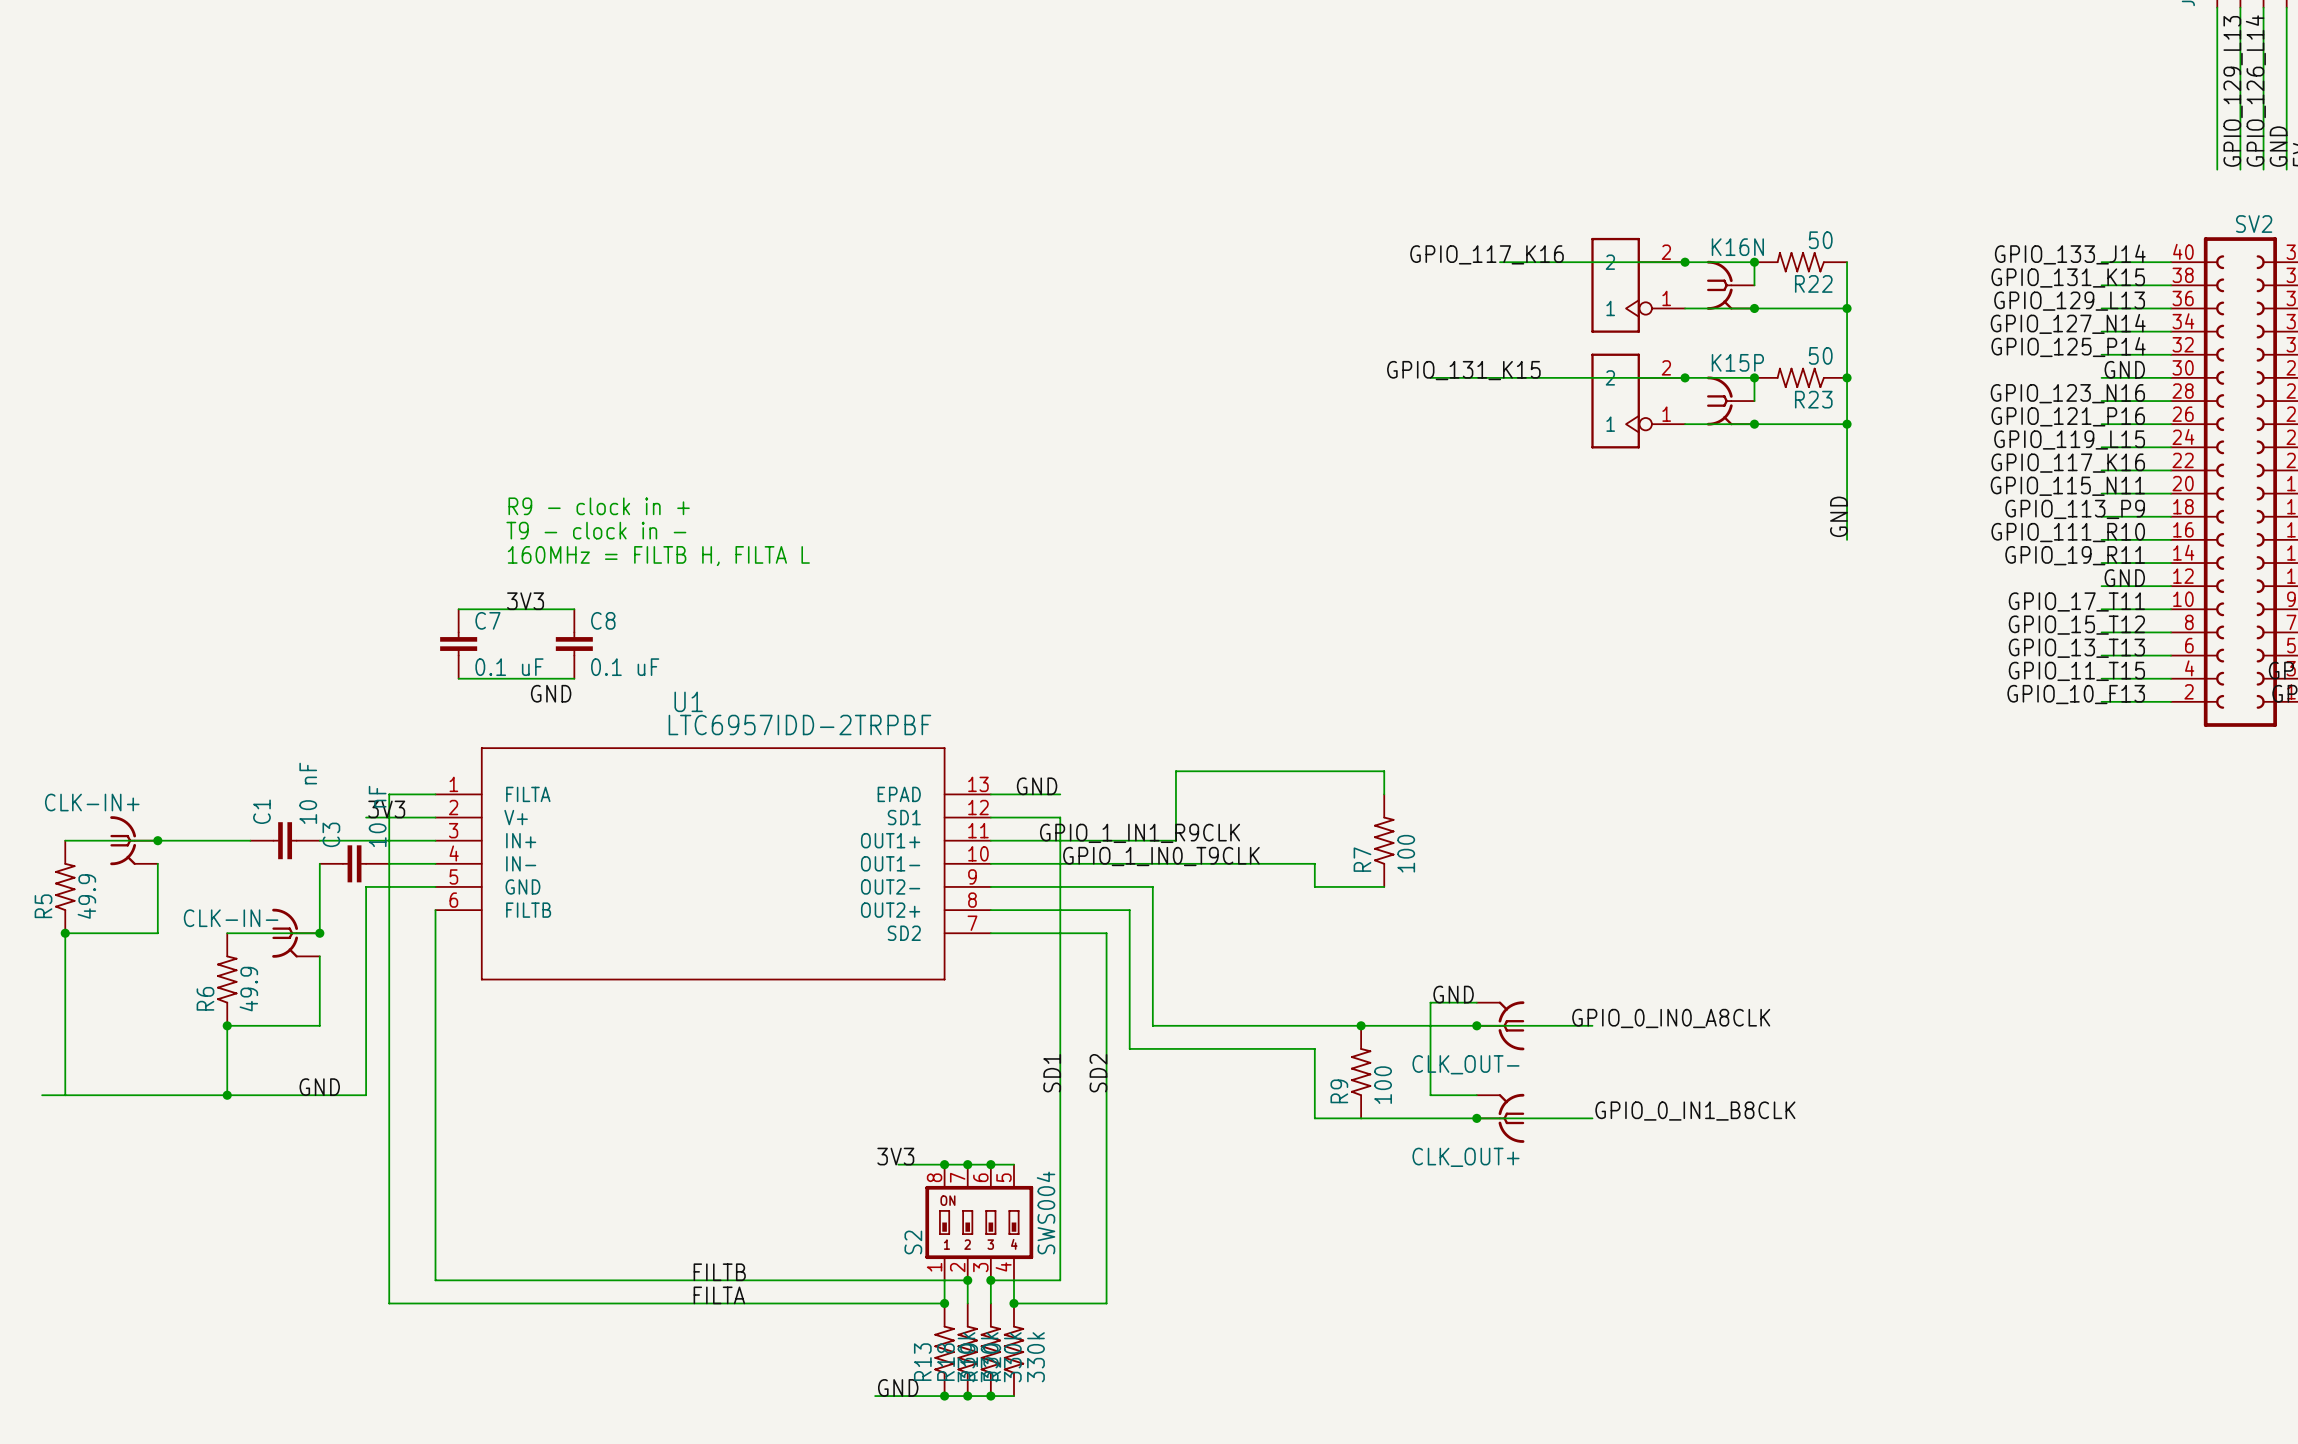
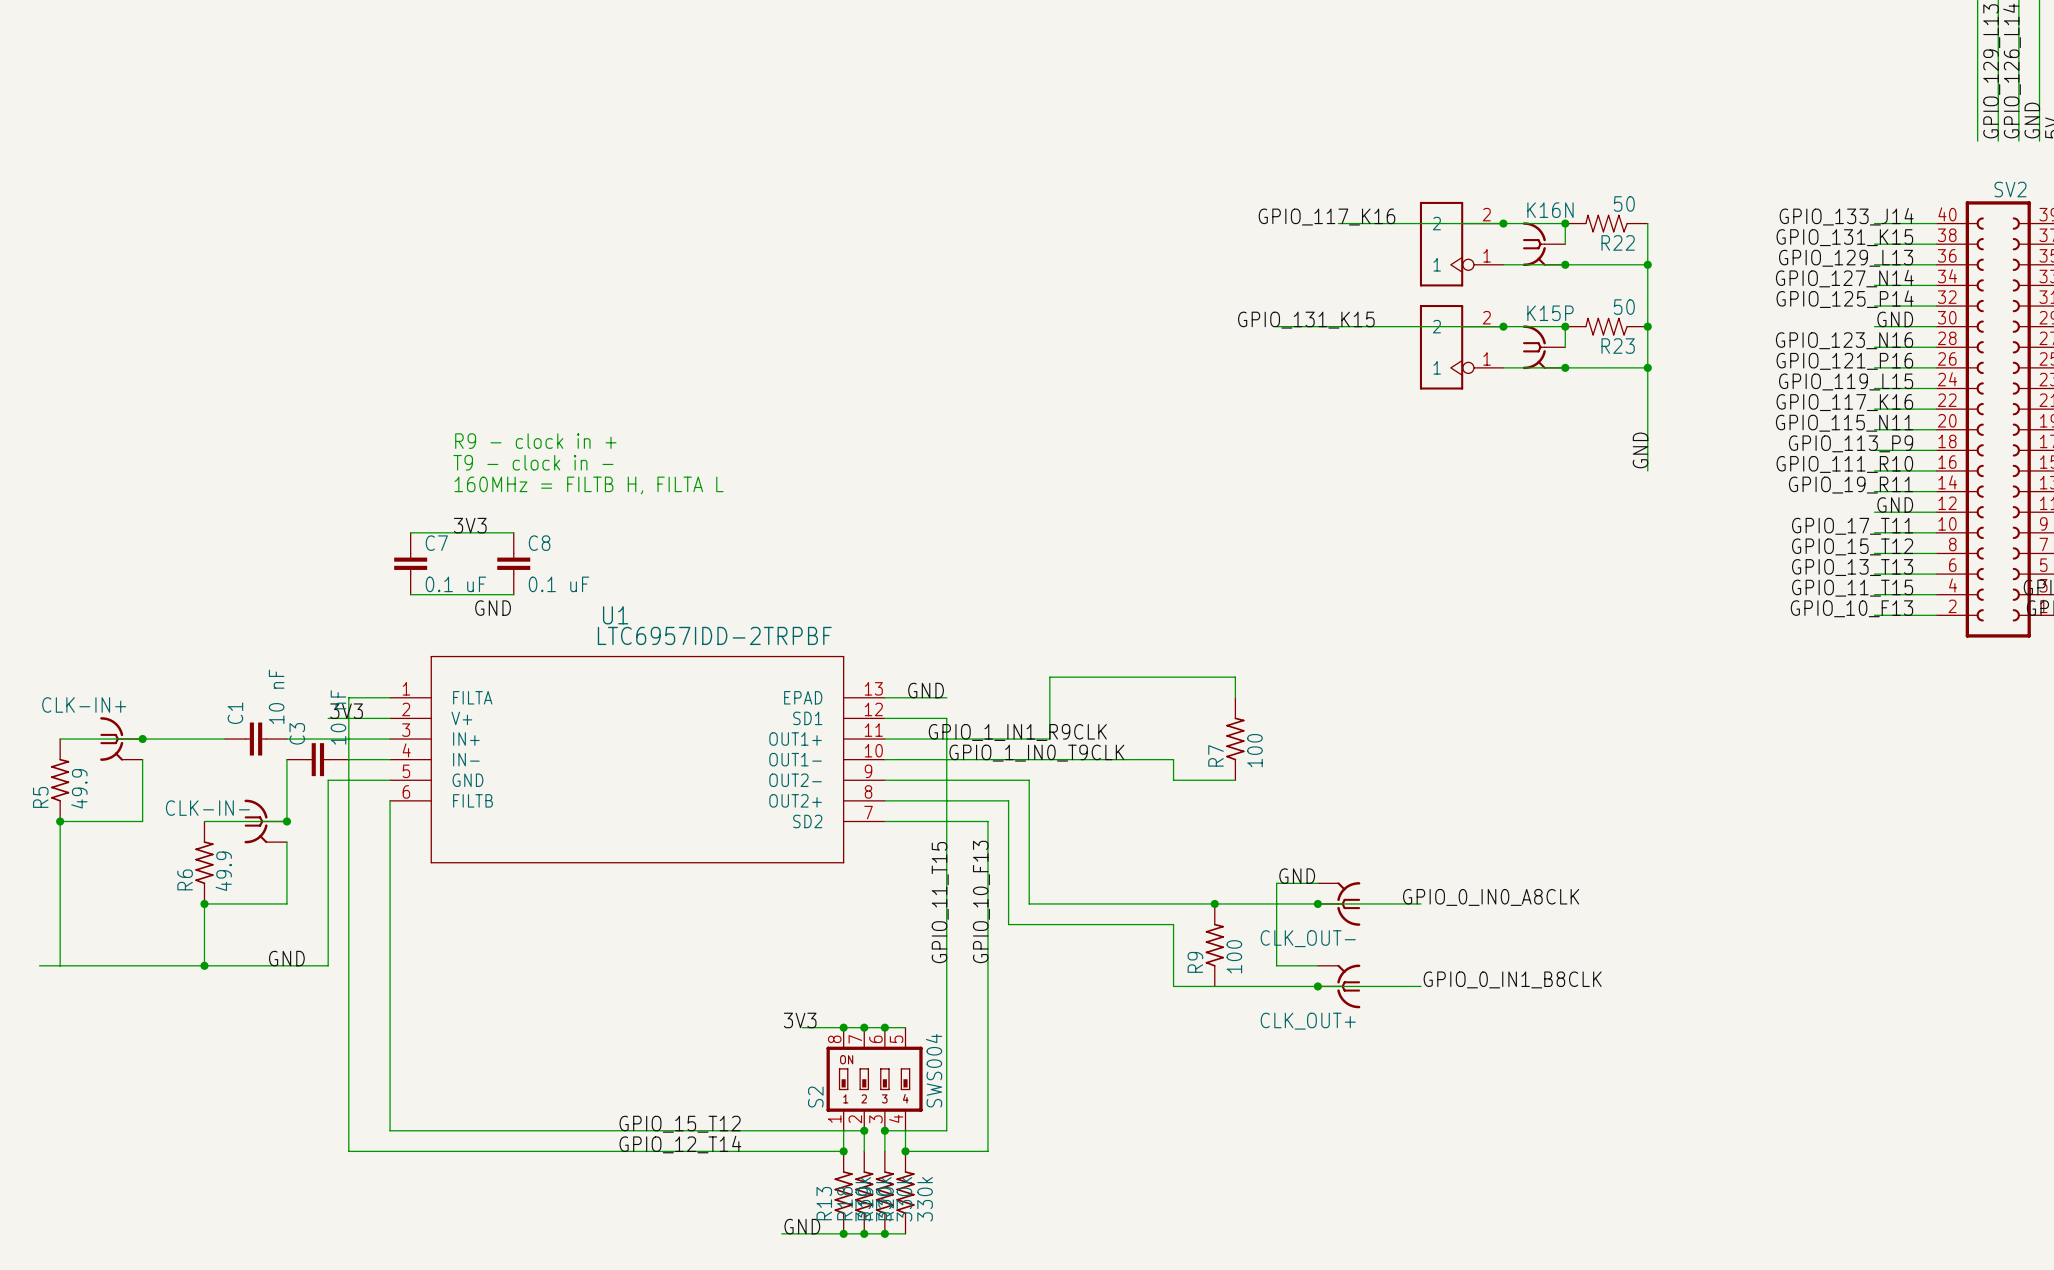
label: SD1 (1052, 1073) -> GPIO_11_T15 (940, 902)
label: SD2 (1098, 1073) -> GPIO_10_F13 (981, 901)
label: FILTB (719, 1272) -> GPIO_15_T12 (680, 1124)
label: FILTA (719, 1295) -> GPIO_12_T14 (680, 1144)

